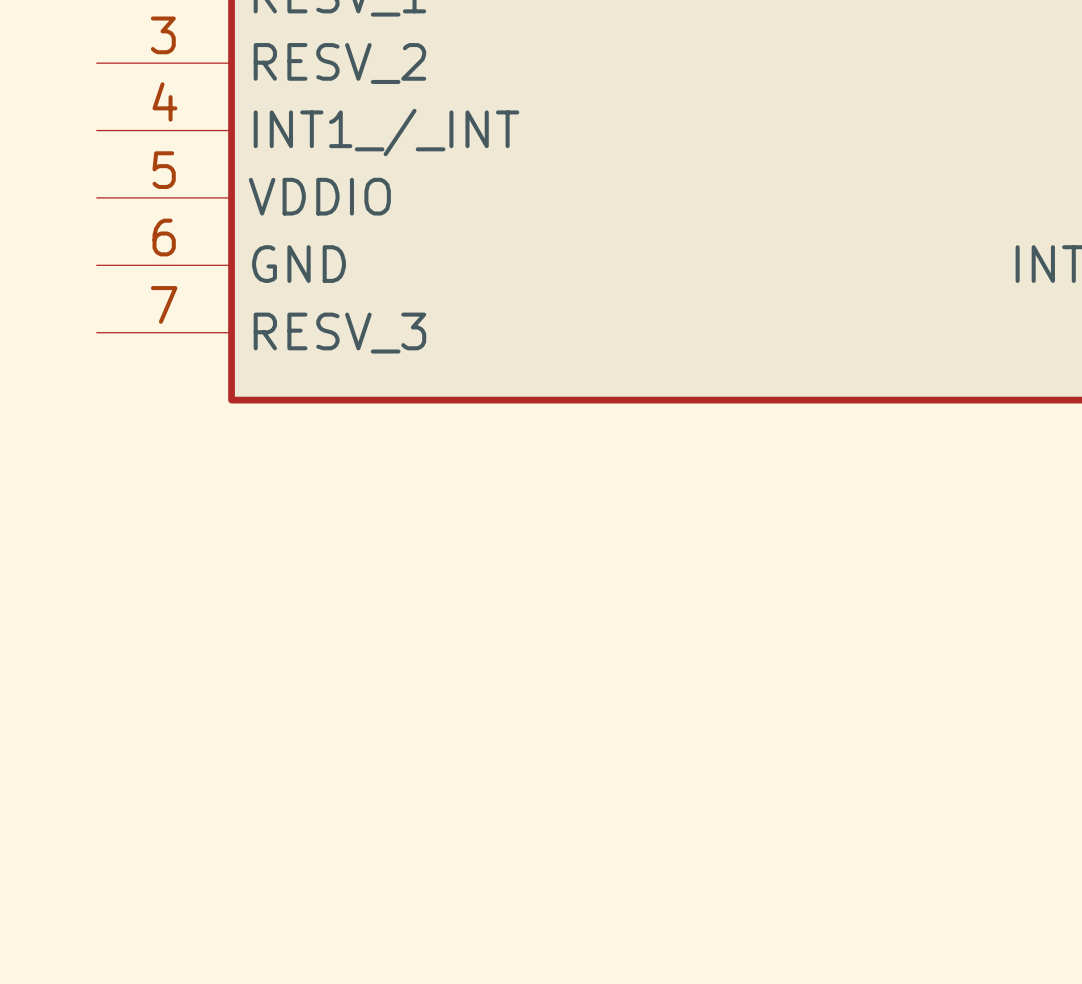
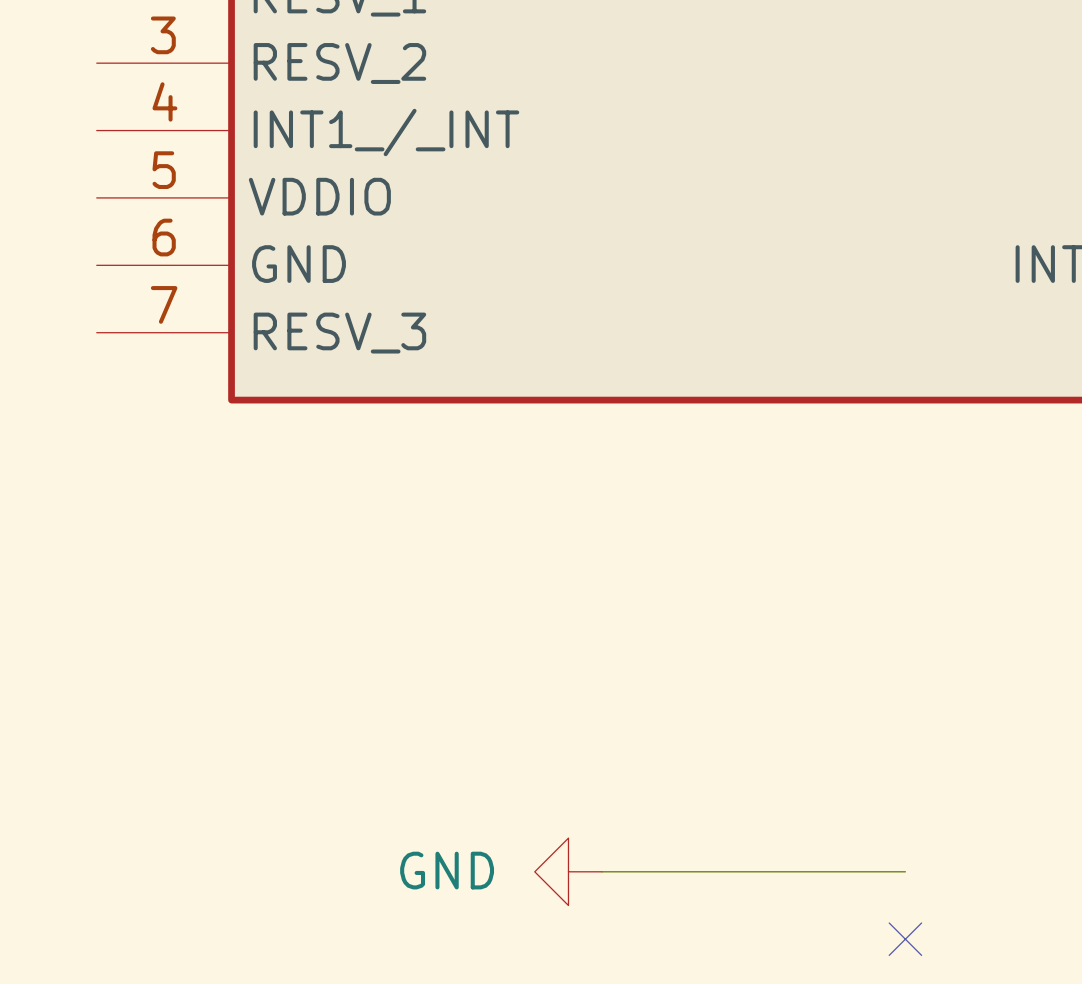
power symbol: none -> GND (568, 871)
wire: none -> (602, 871) (905, 871)
no-connect mark: none -> (905, 939)

